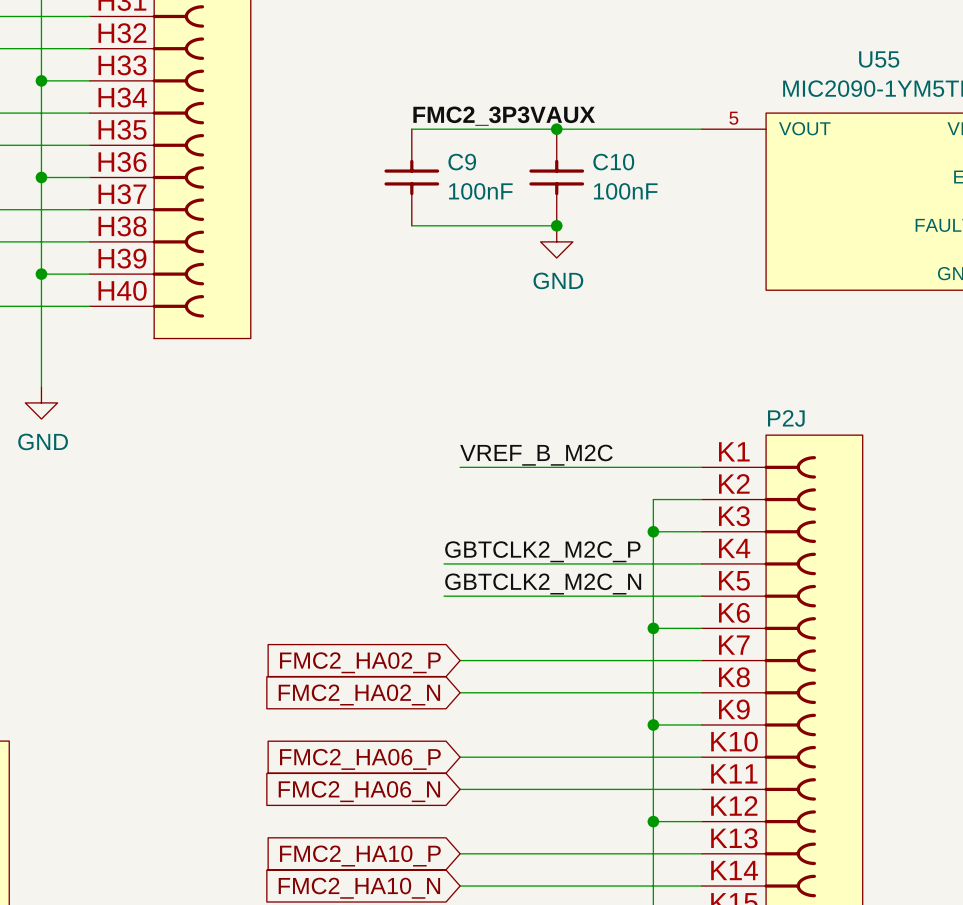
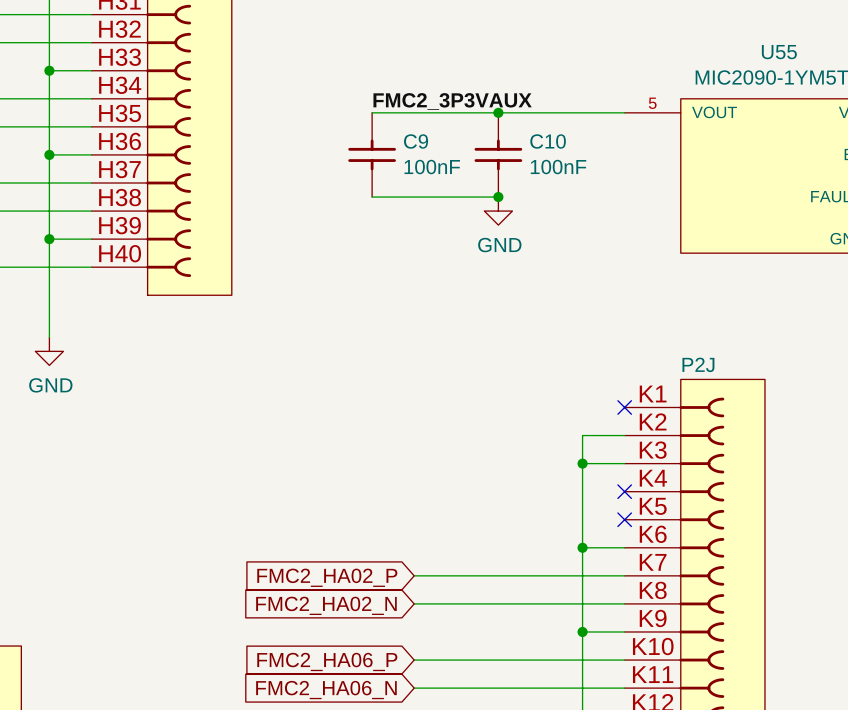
label: VREF_B_M2C (536, 455) -> none
wire: (460, 467) (701, 467) -> none
no-connect mark: none -> (624, 407)
label: GBTCLK2_M2C_P (542, 551) -> none
wire: (444, 563) (701, 563) -> none
no-connect mark: none -> (624, 491)
label: GBTCLK2_M2C_N (543, 584) -> none
wire: (444, 596) (701, 596) -> none
no-connect mark: none -> (624, 519)

